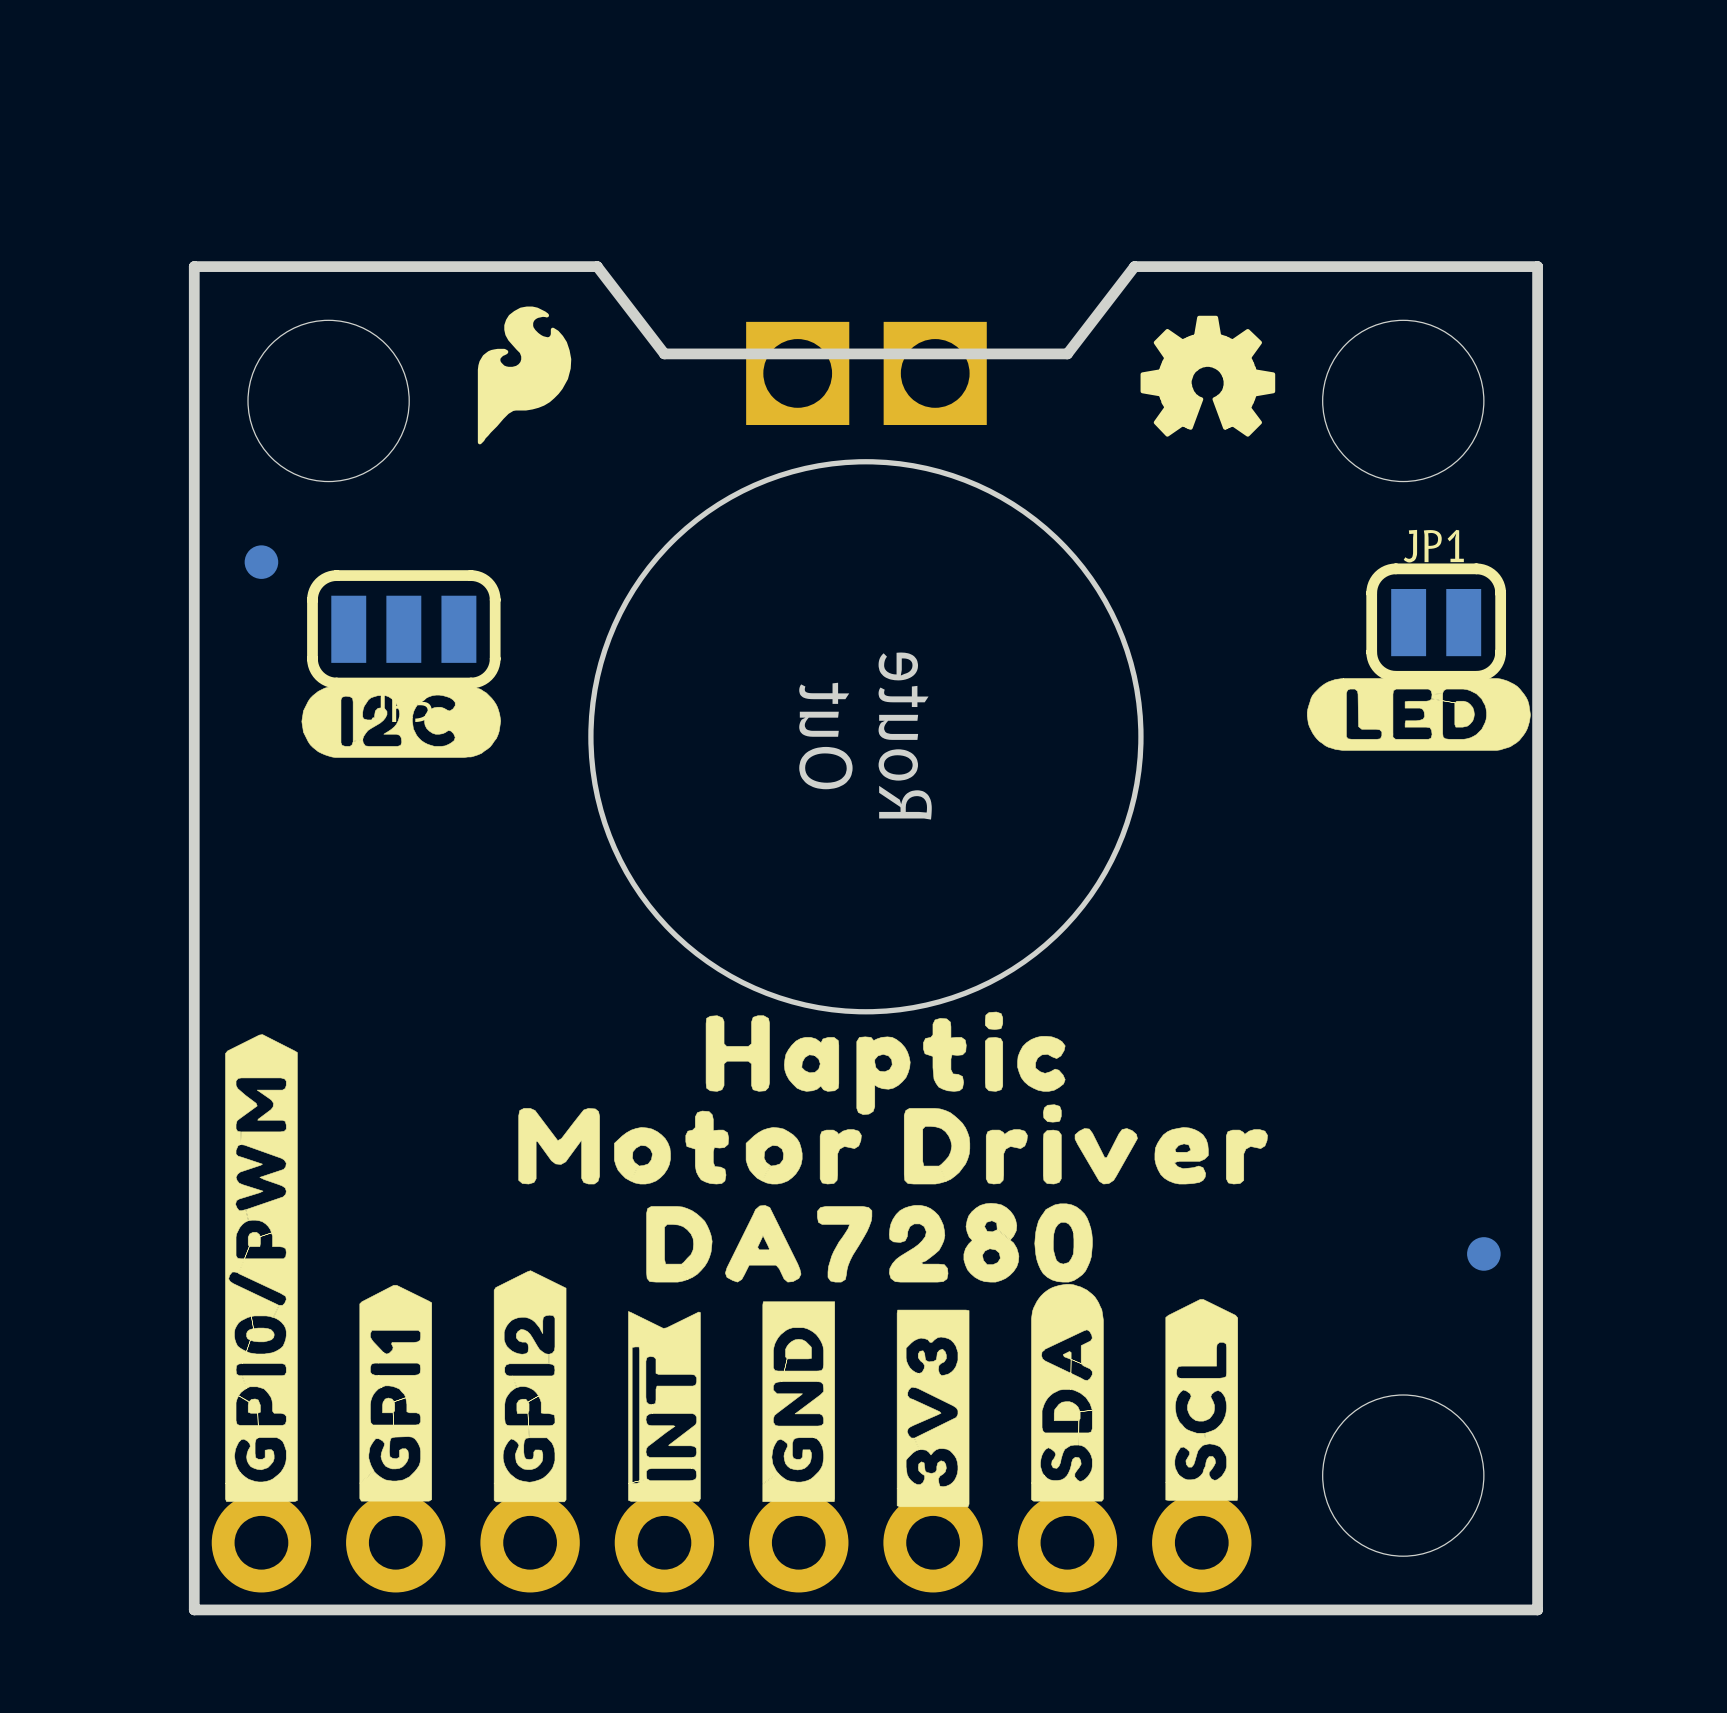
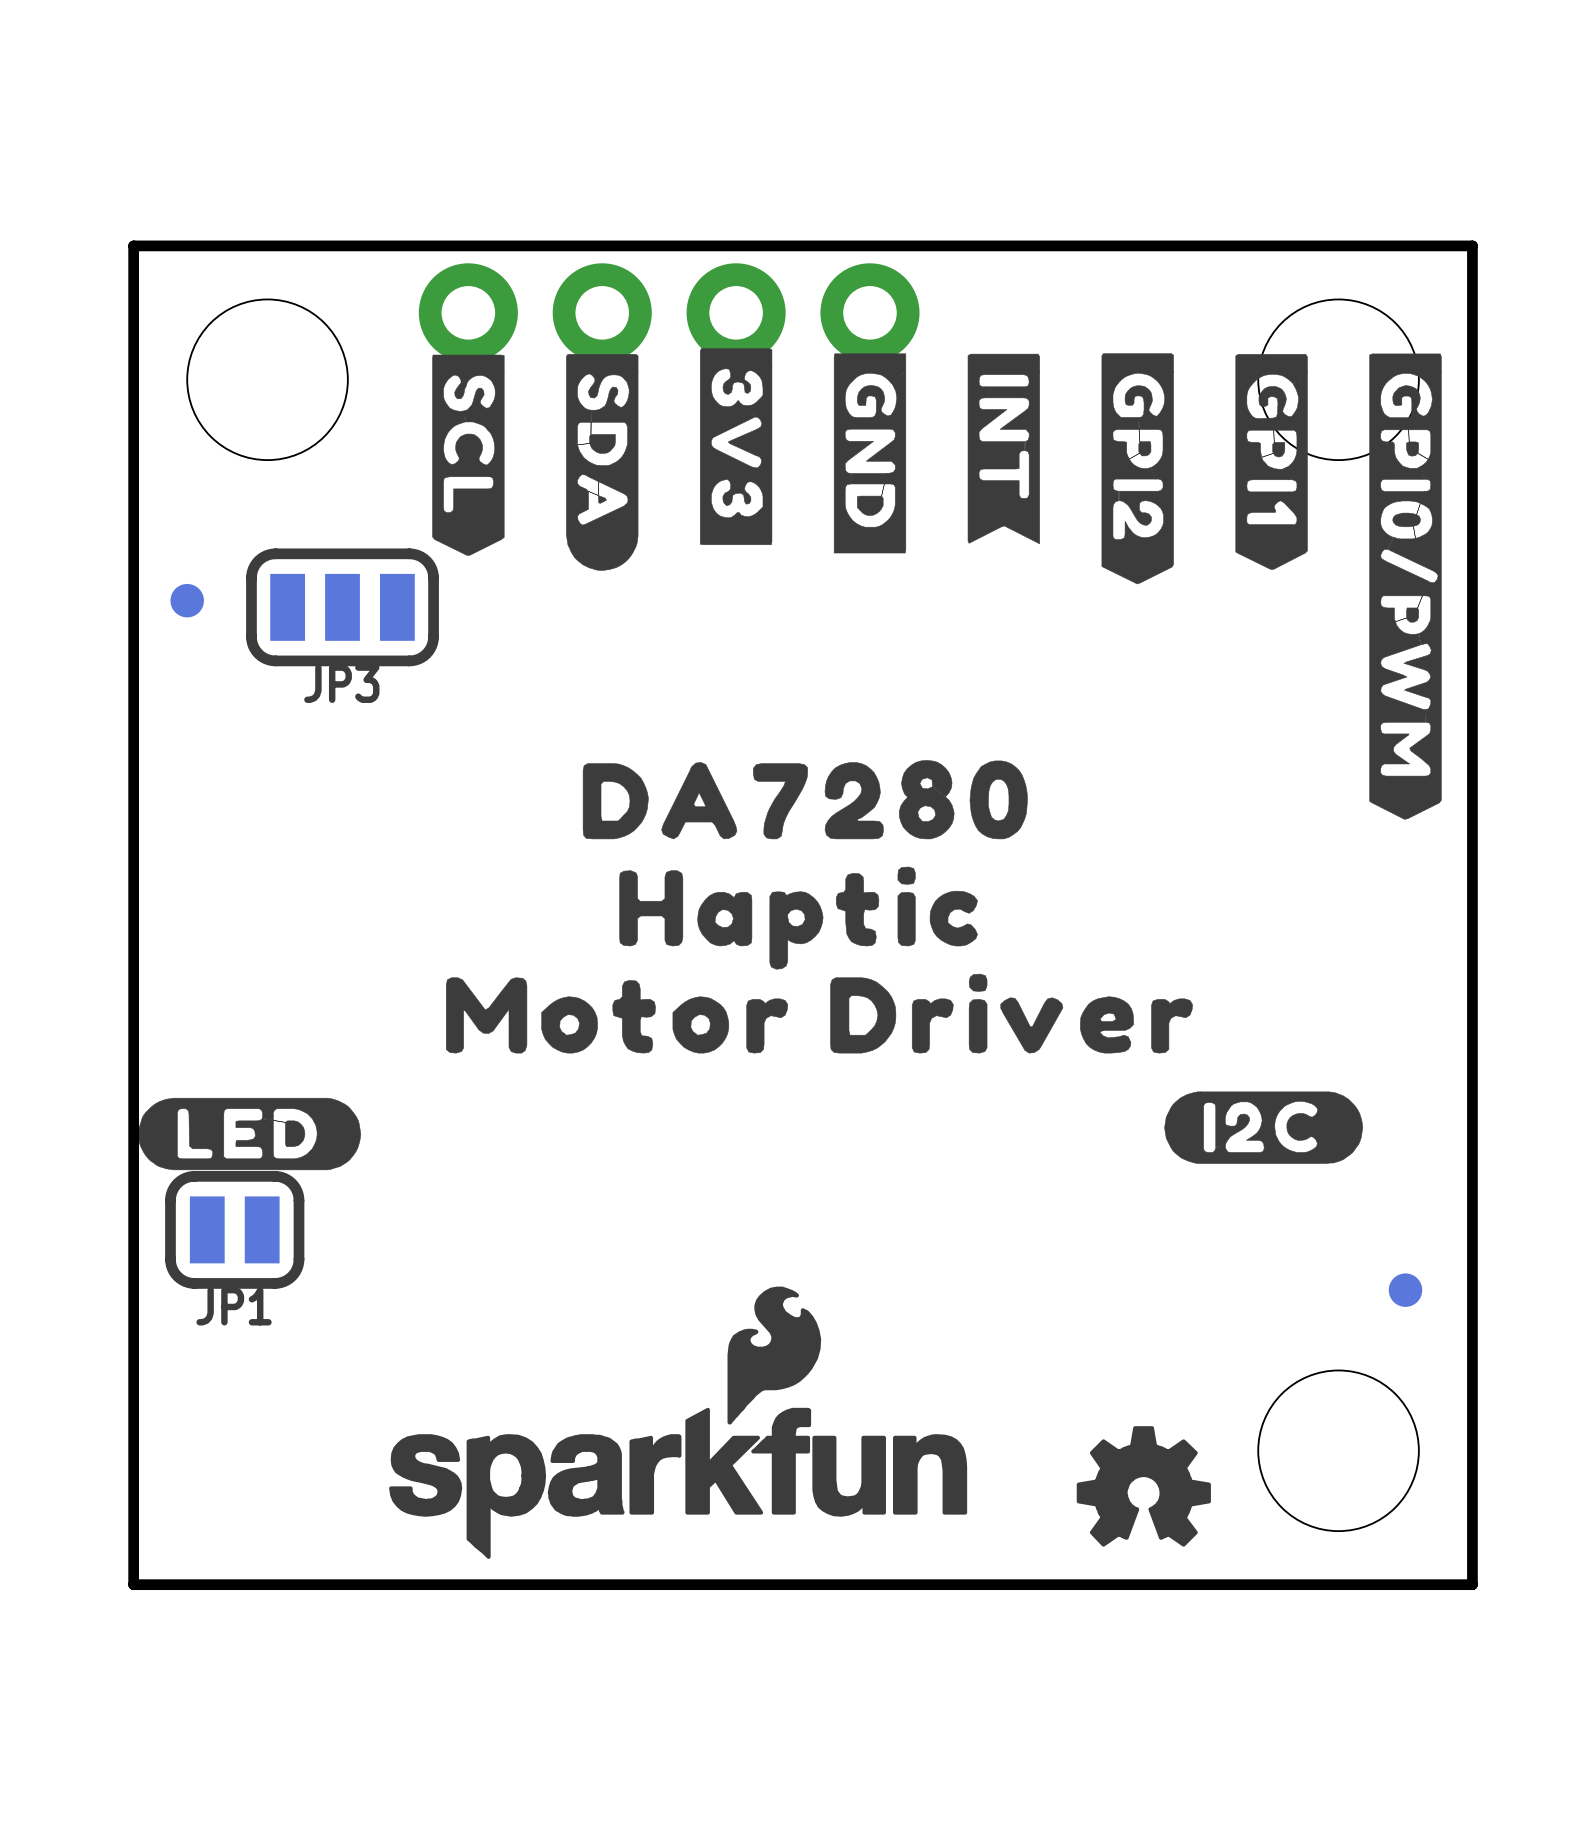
board edge: (1134, 266) (1067, 353) (664, 353) (597, 266) -> (1070, 245) (535, 245)
drawing: [477, 306, 572, 445] -> none
part: none -> (669, 312)
drawing: none -> [432, 348, 1442, 820]
drawing position: (1207, 376) -> (1143, 1486)
JP1 name position: JP1 (1433, 546) -> JP1 (234, 1306)
part position: (261, 562) -> (187, 600)
JP1 position: (1436, 622) -> (234, 1229)
part: (865, 668) -> none
drawing position: (1418, 714) -> (249, 1134)
drawing position: (401, 721) -> (1263, 1127)
drawing: [225, 1034, 1238, 1508] -> none
drawing position: (885, 1063) -> (798, 918)
drawing position: (893, 1144) -> (819, 1013)
drawing position: (869, 1242) -> (805, 799)
part position: (1483, 1253) -> (1405, 1290)
drawing: none -> [389, 1286, 968, 1559]
part: (462, 1542) -> none
part: (1000, 1542) -> none

